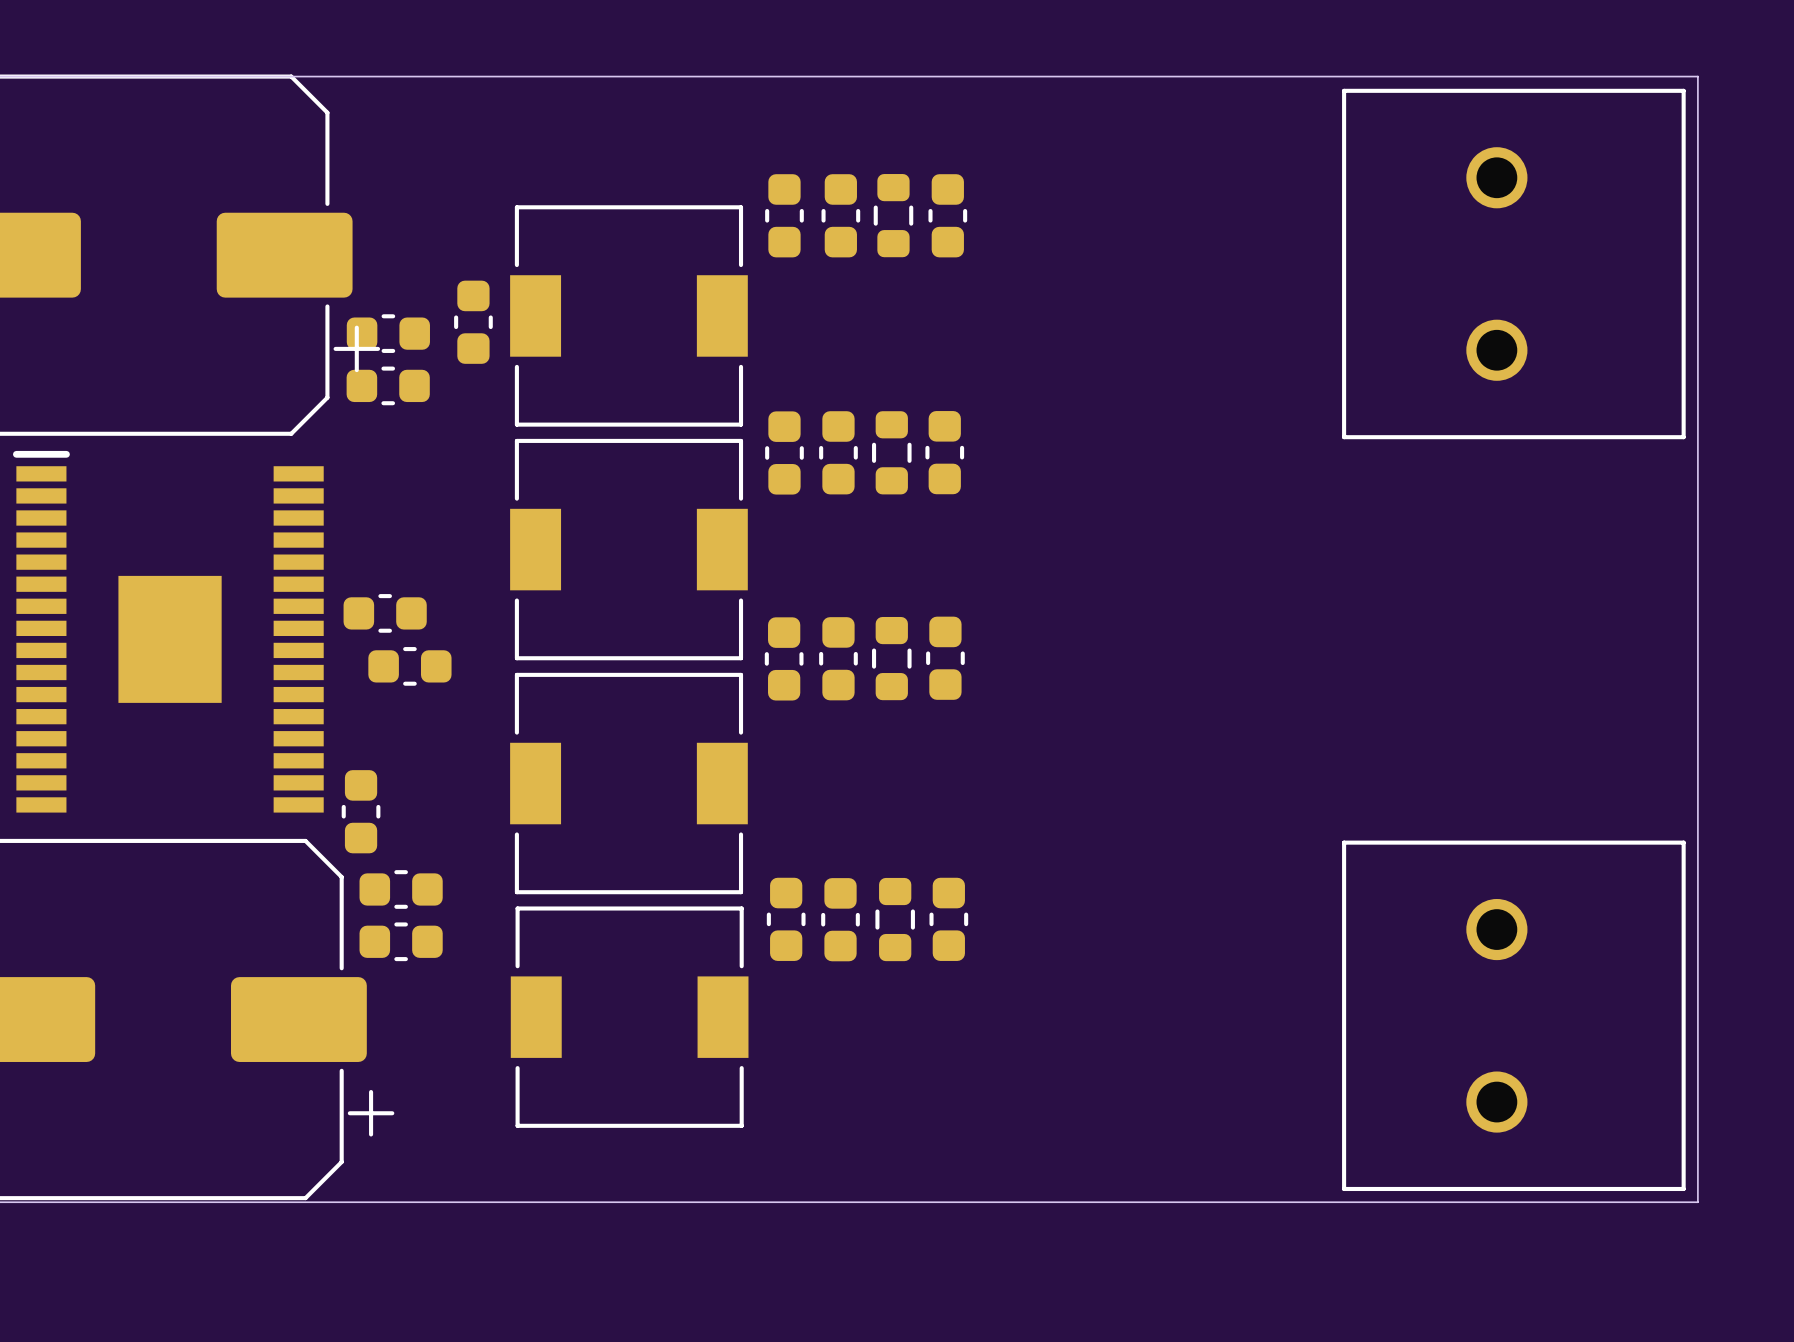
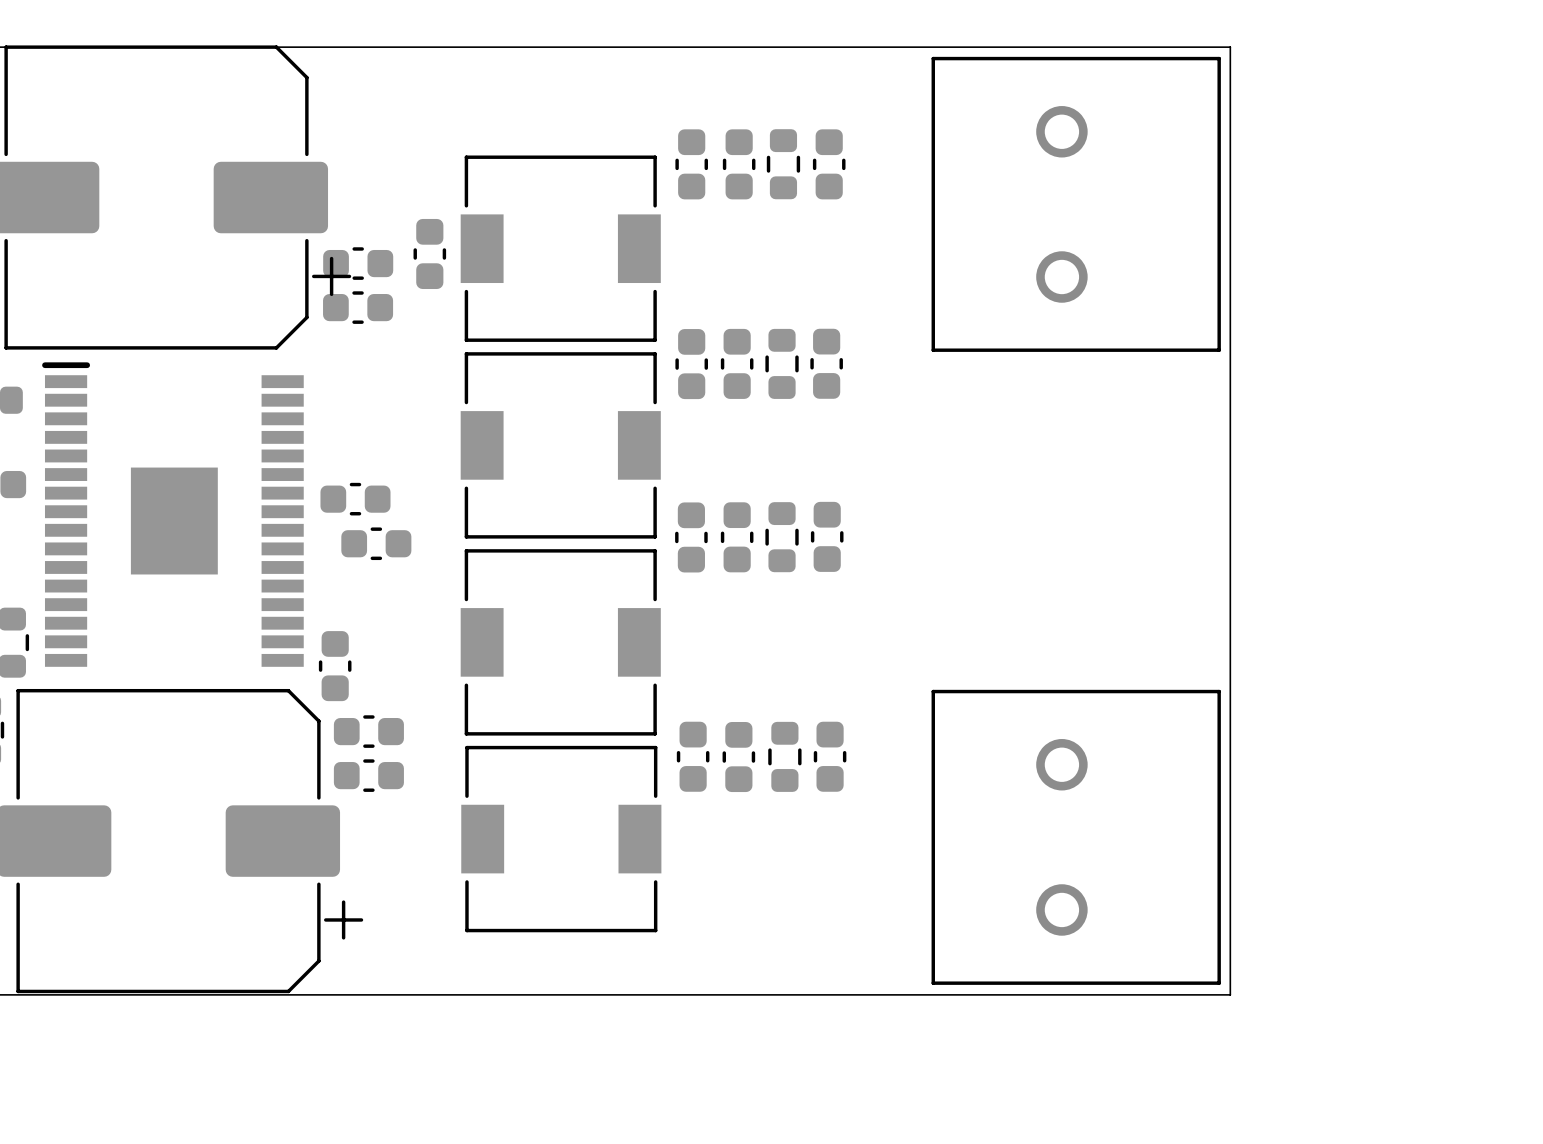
board edge: (1424, 76) (1697, 76) (1697, 1202) (1424, 1202) -> (1230, 47) (1230, 994)
part position: (1513, 264) -> (1076, 204)
part position: (1513, 1015) -> (1076, 837)

